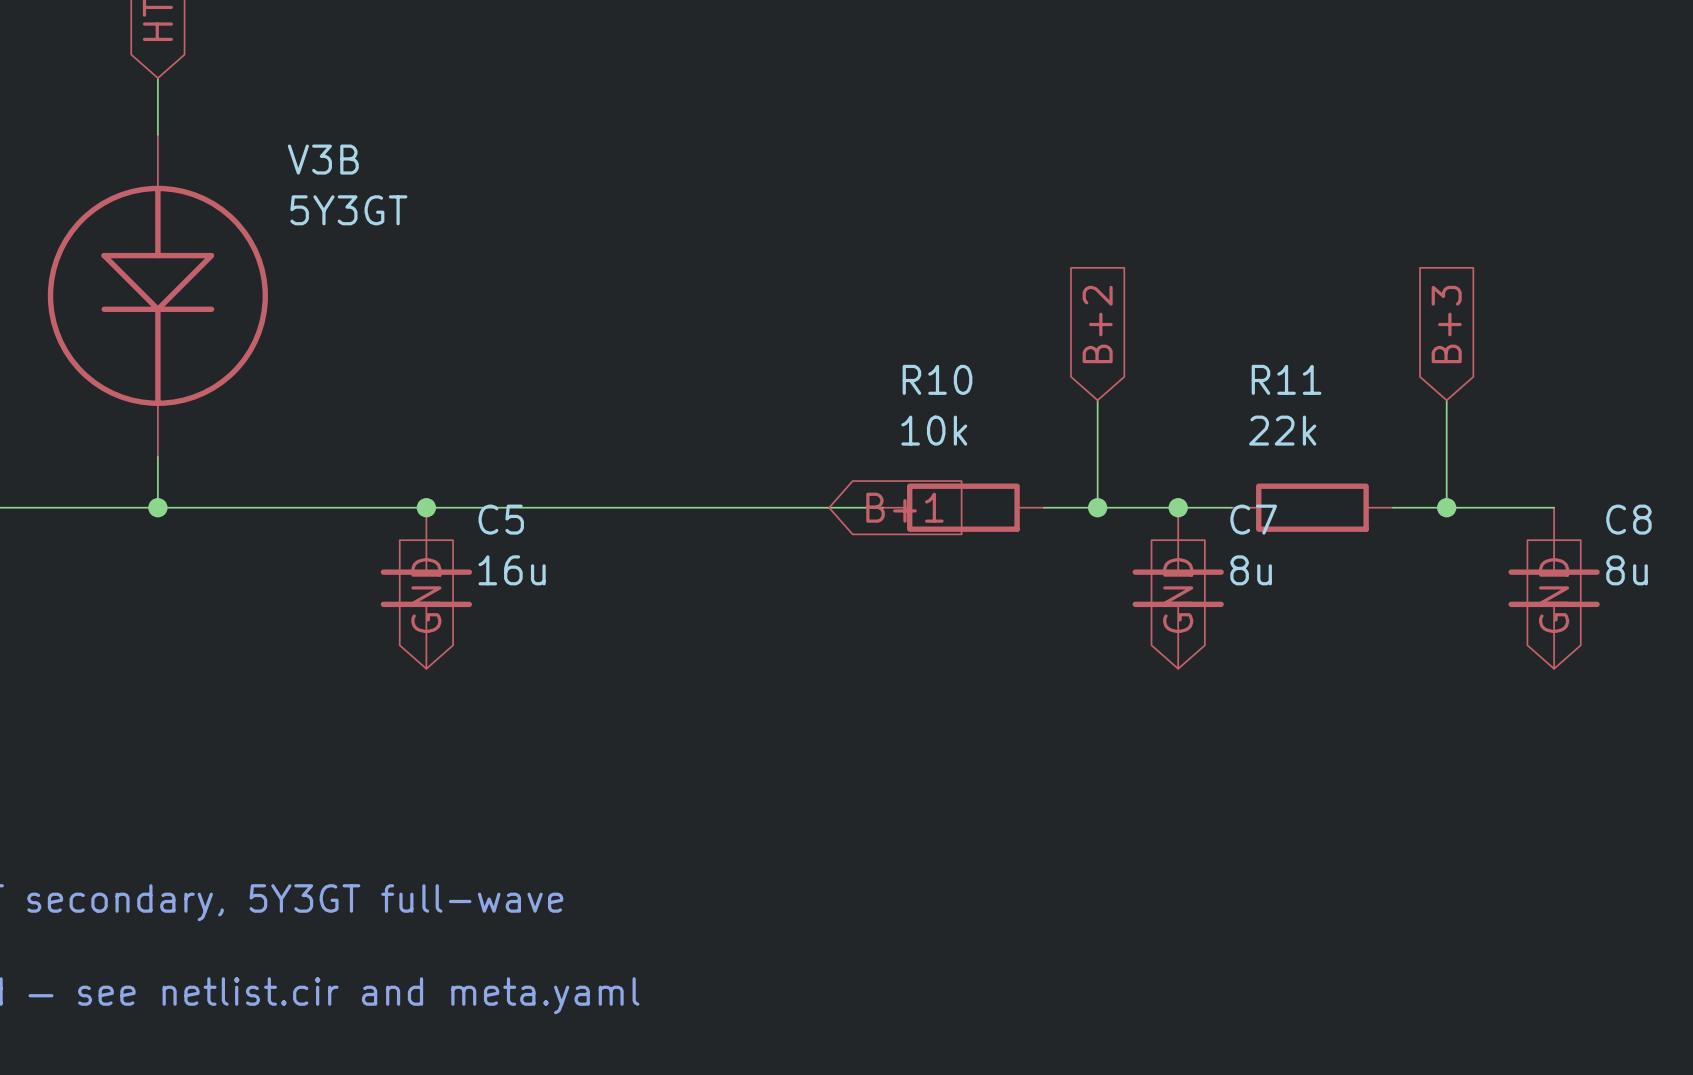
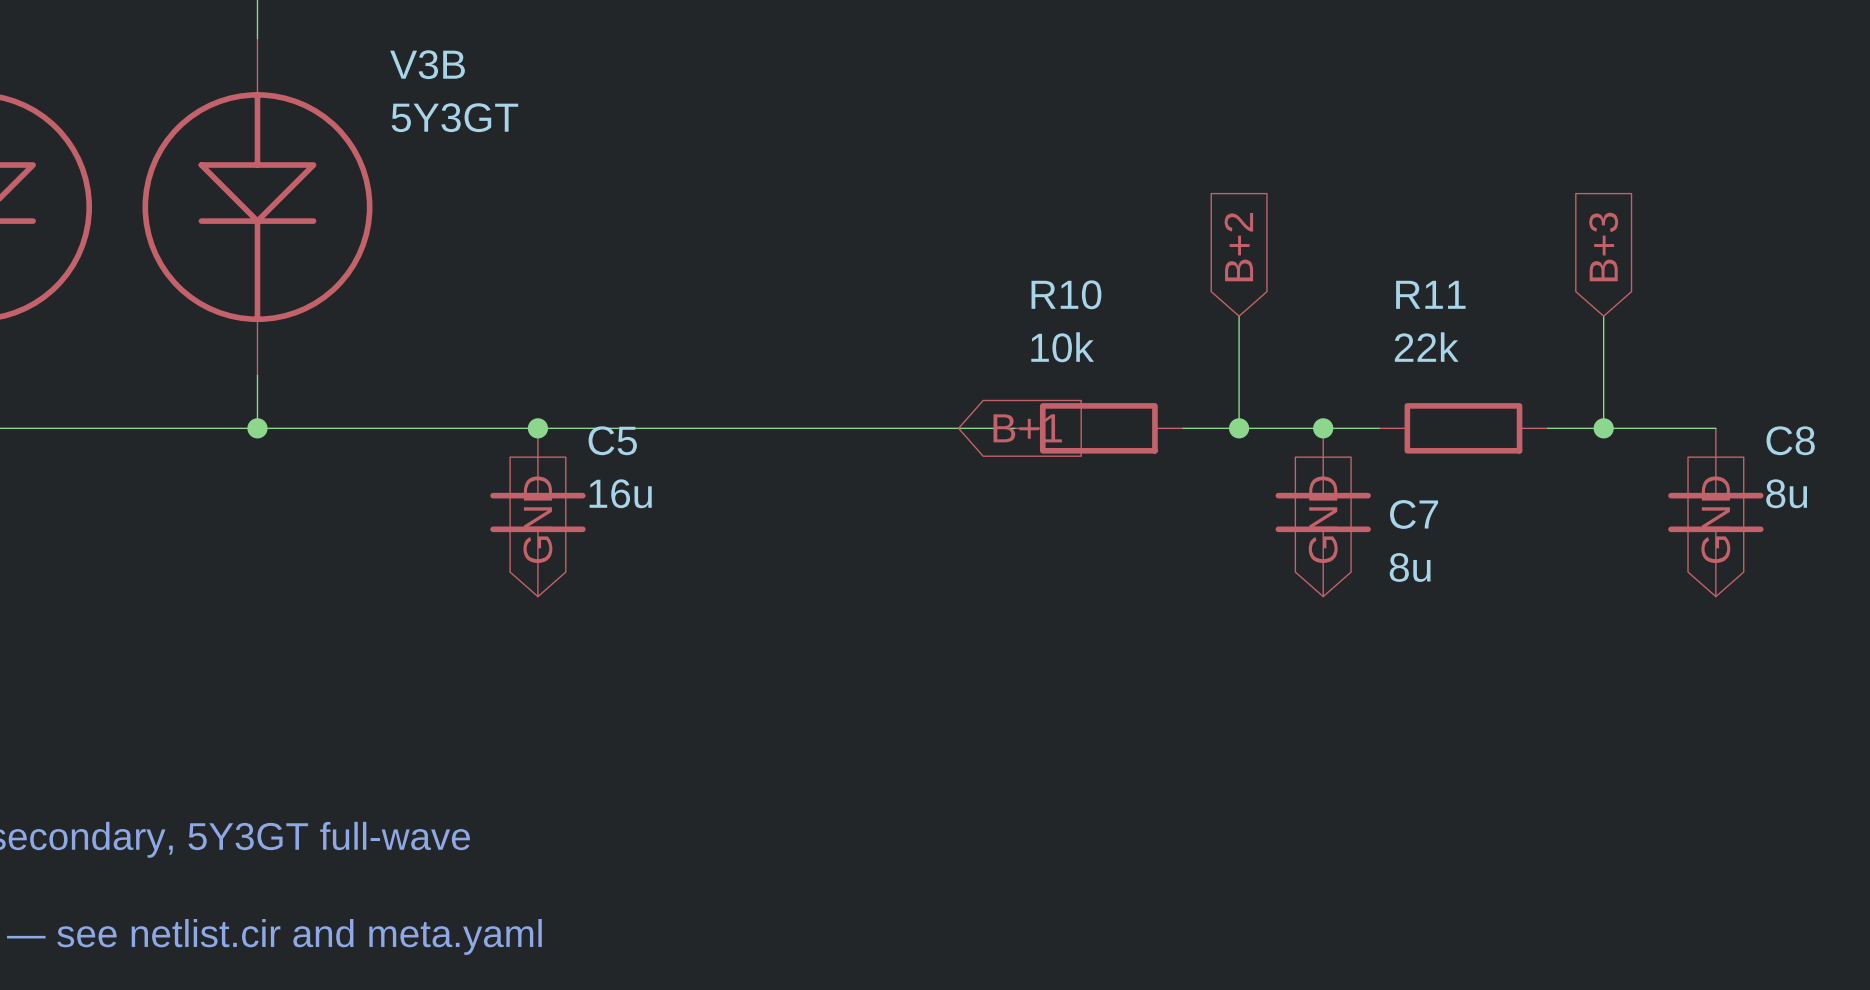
C7 name position: C7 (1253, 519) -> C7 (1414, 514)
C7 value position: 8u (1251, 570) -> 8u (1410, 567)

